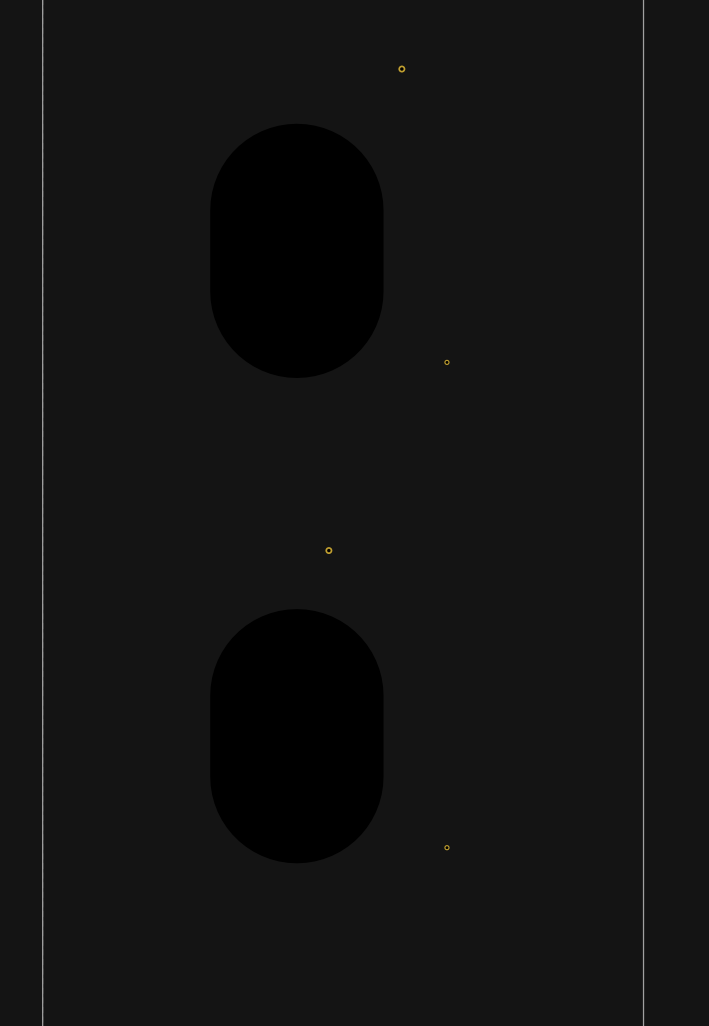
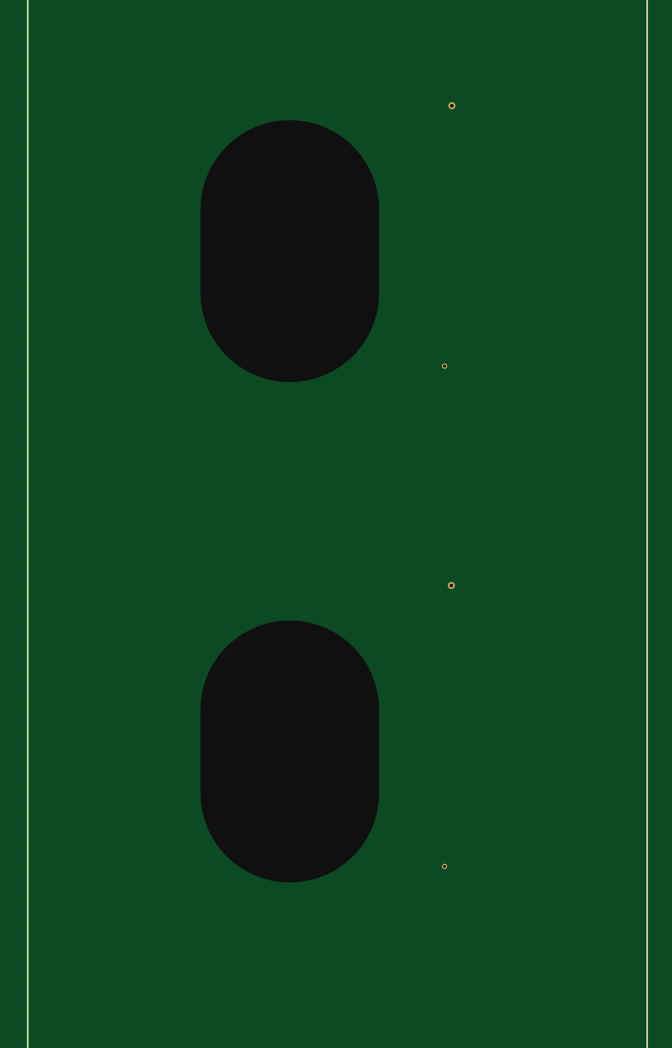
via position: (401, 69) -> (451, 105)
via: (328, 550) -> none
via: none -> (451, 585)

